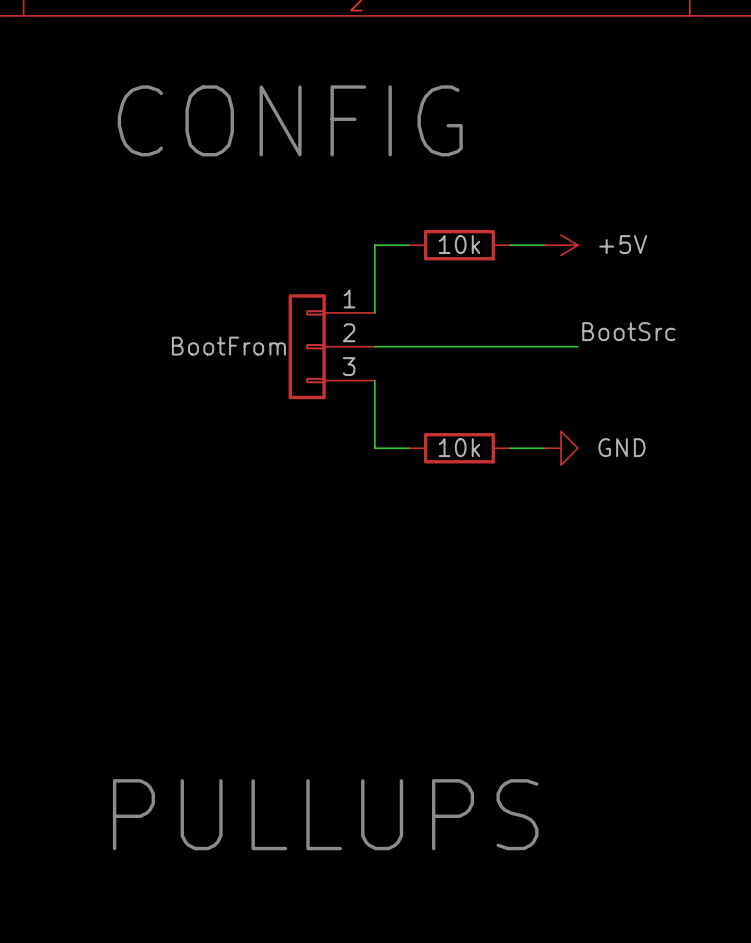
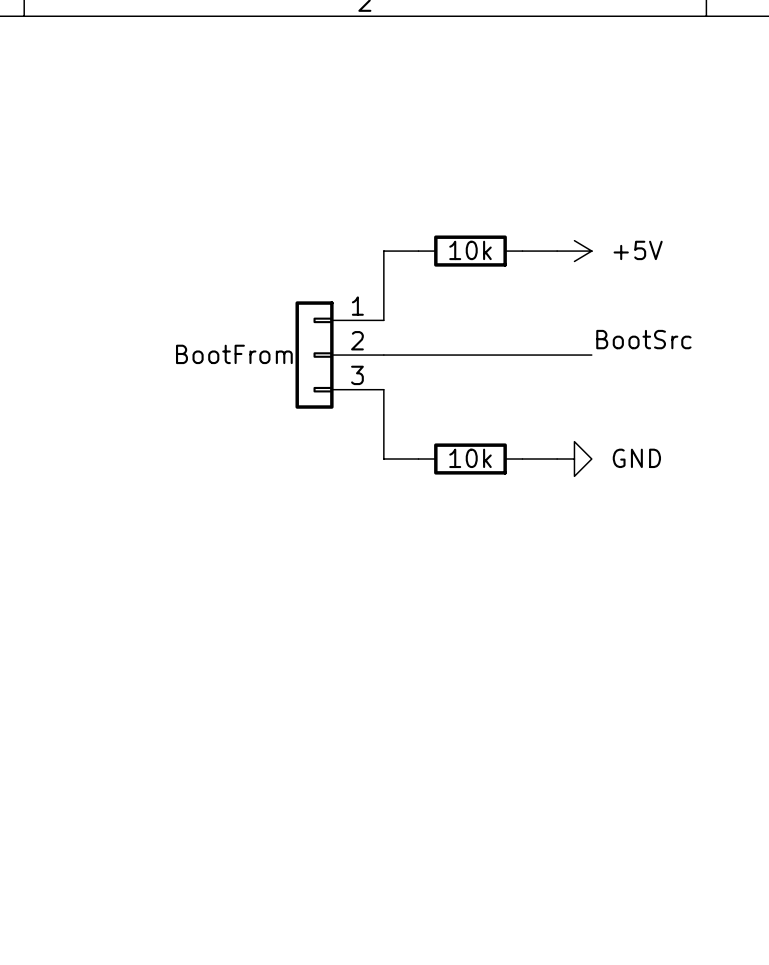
text: CONFIG (290, 120) -> none
text: PULLUPS (325, 814) -> none

